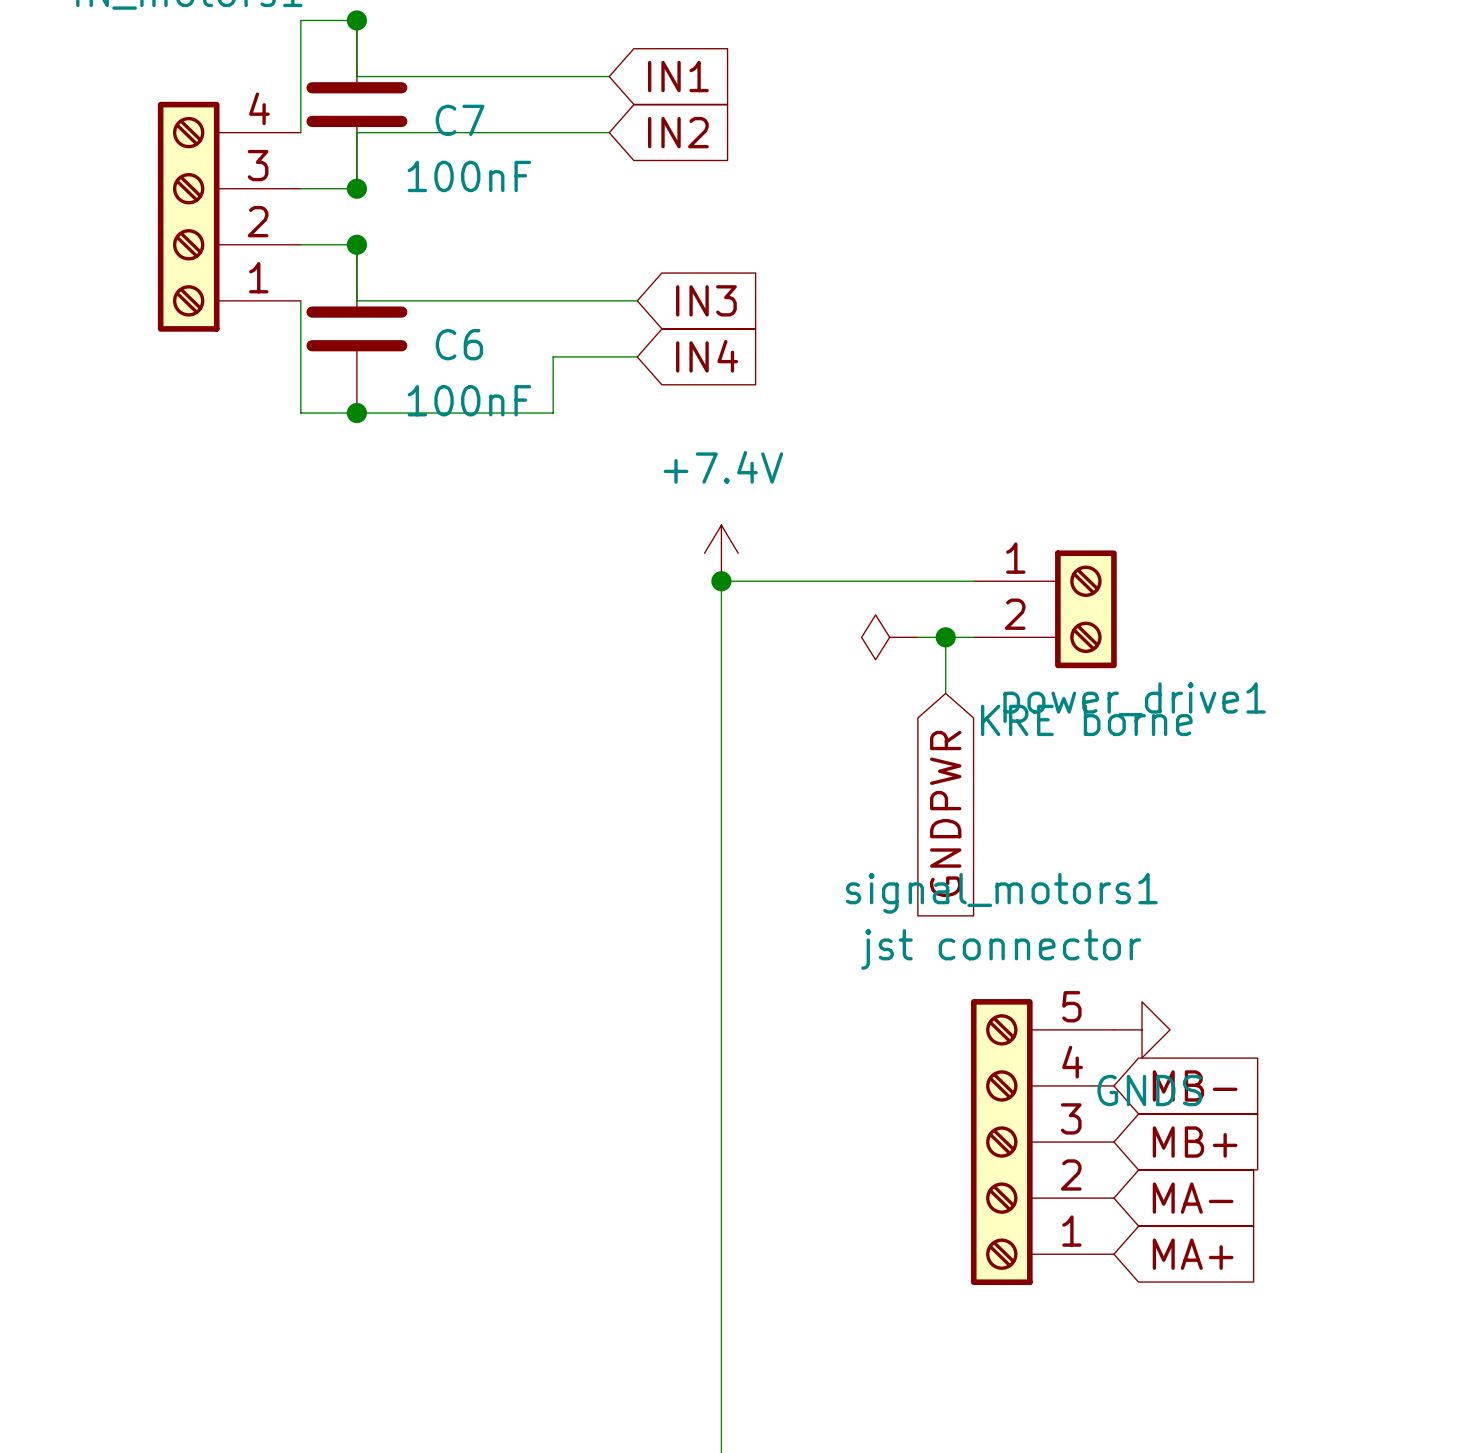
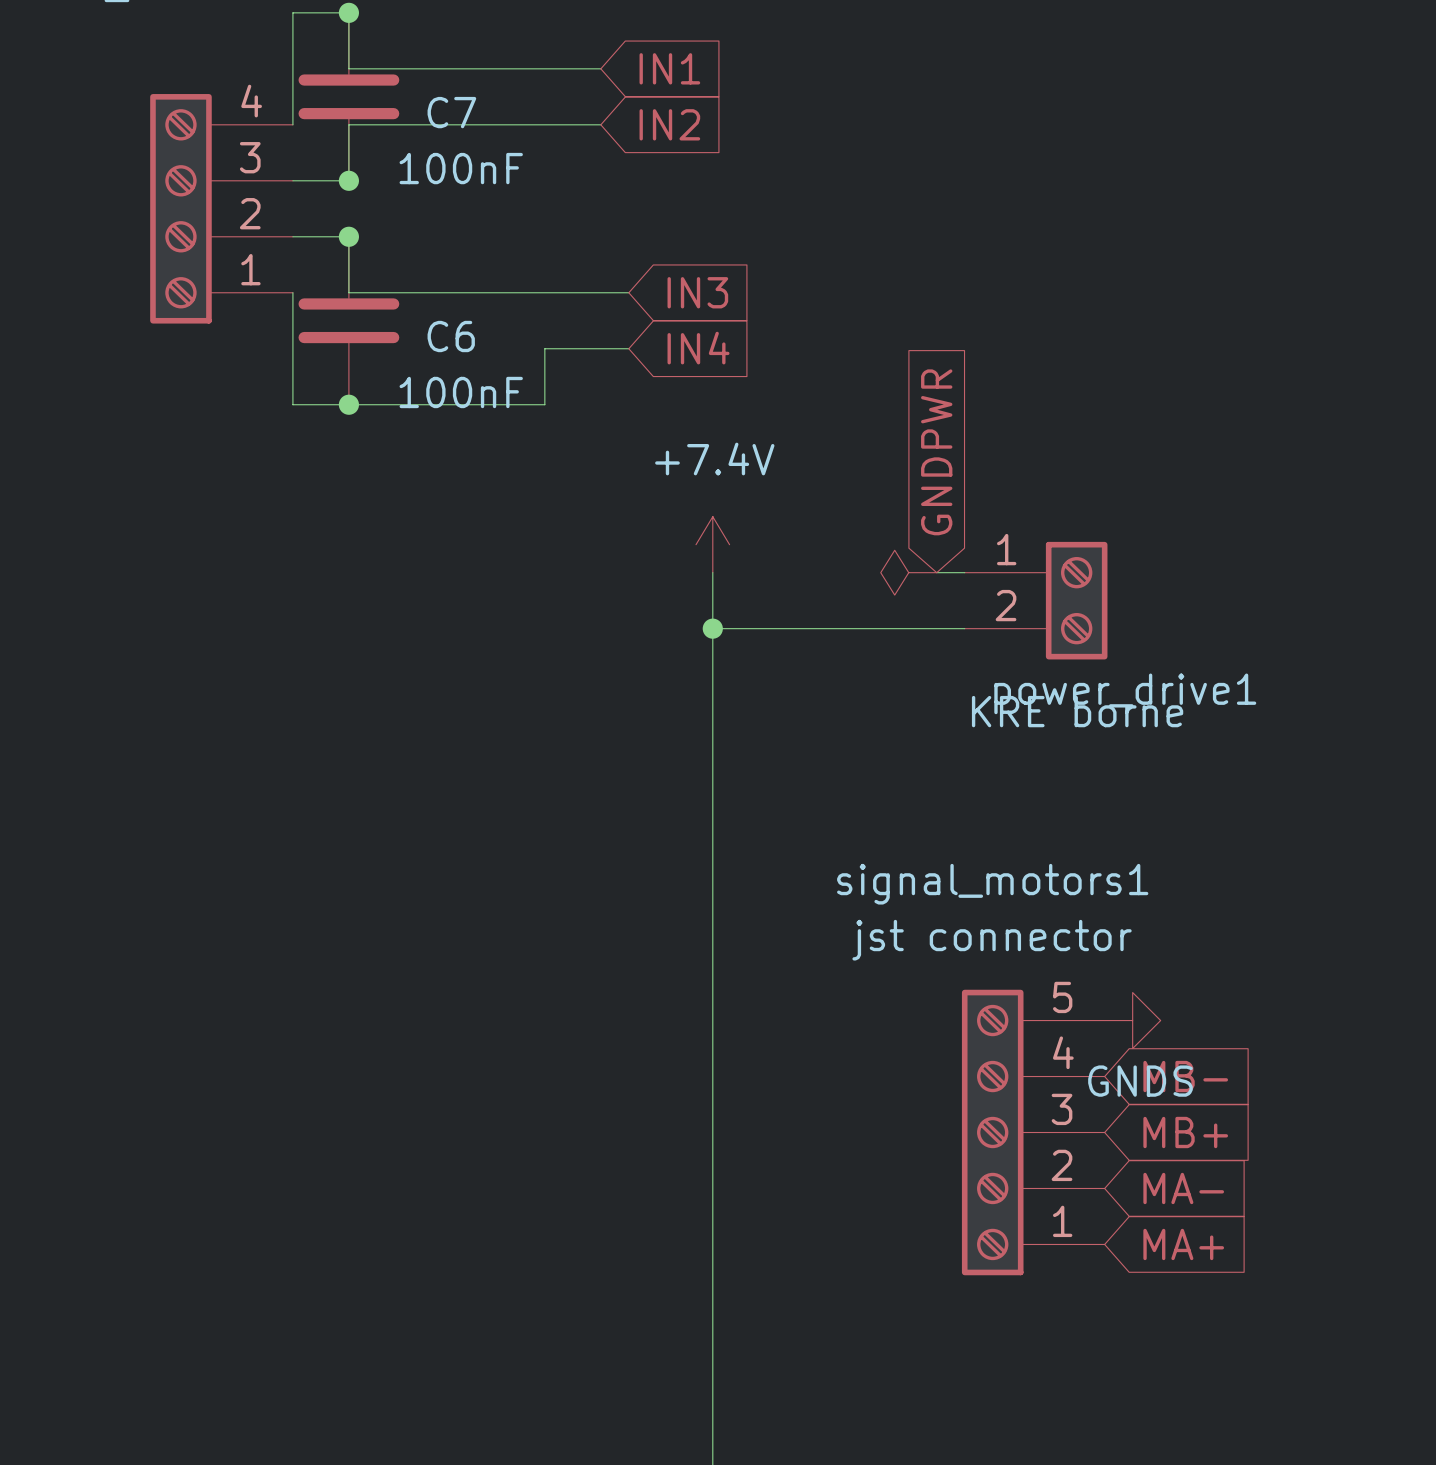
wire: (721, 581) (945, 581) -> none
junction position: (721, 581) -> (712, 628)
wire: none -> (712, 628) (908, 628)
power symbol position: (889, 637) -> (908, 572)
wire: (945, 637) (945, 693) -> none
junction: (945, 637) -> none
global label rotation: 0° (945, 813) -> 180° (936, 452)
global label position: GNDPWR (945, 813) -> GNDPWR (936, 452)

